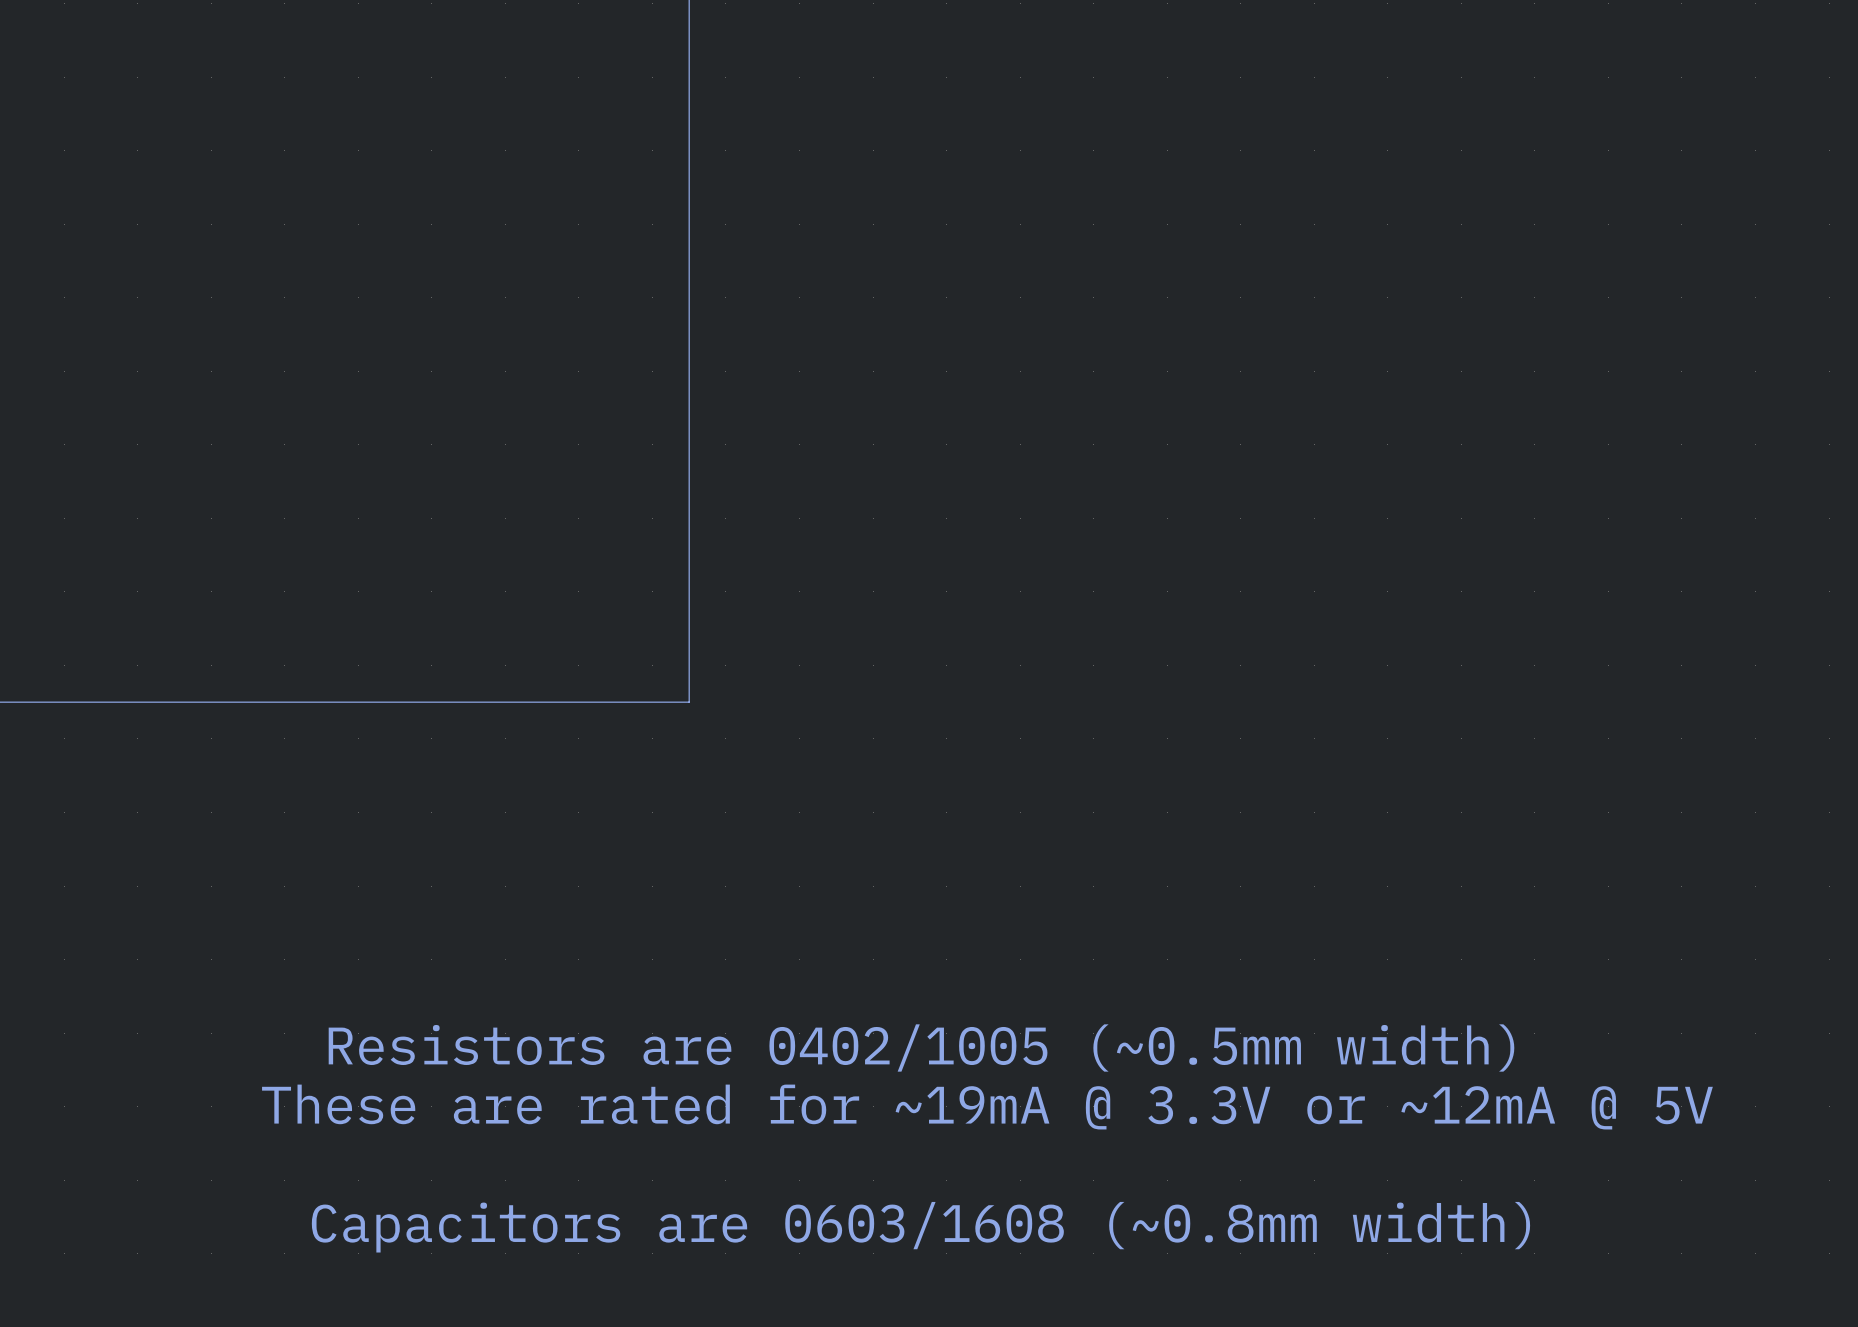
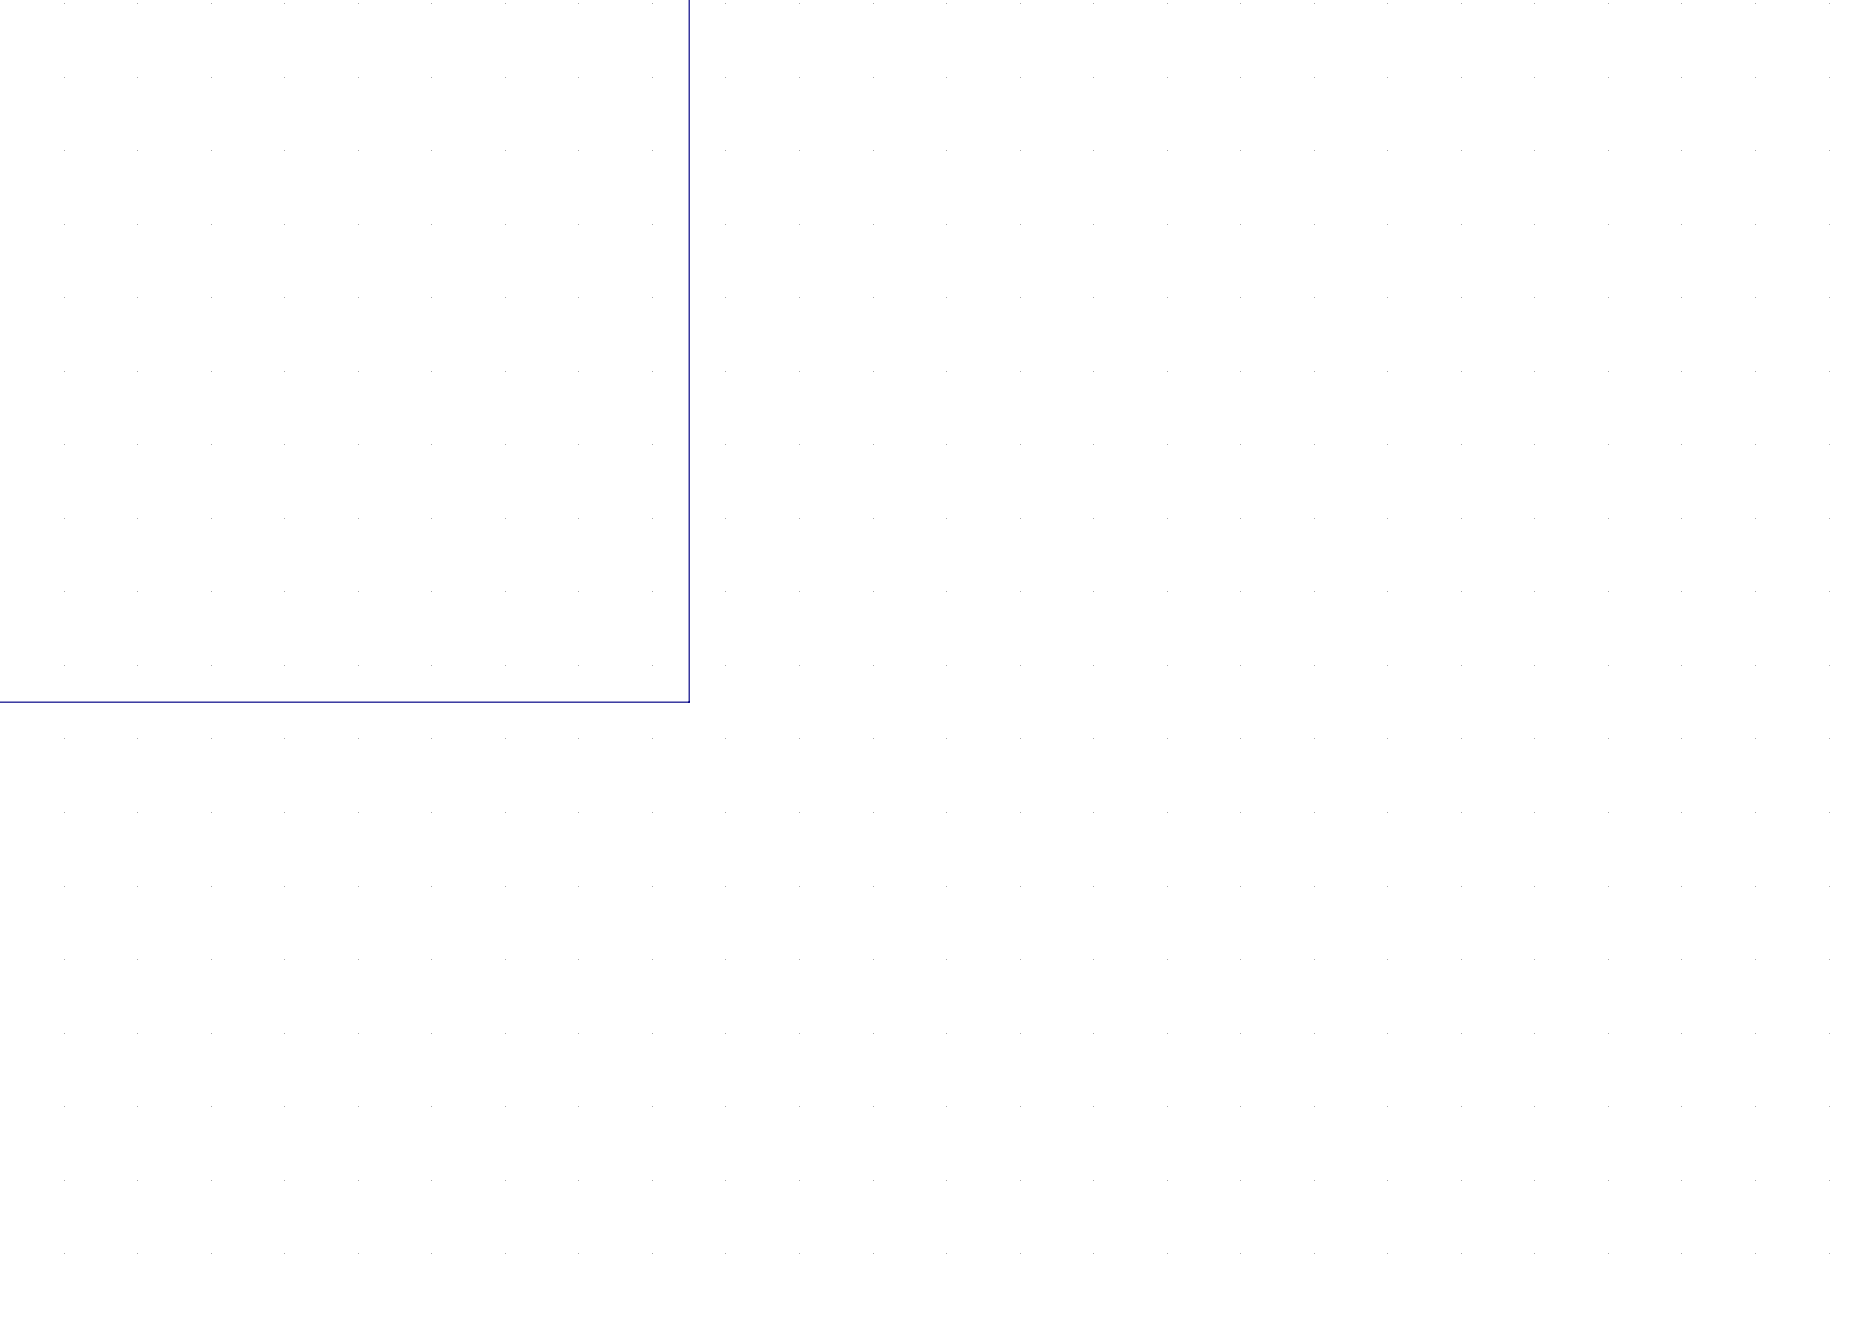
text: Resistors are 0402/1005 (~0.5mm width) (921, 1047) -> none
text: These are rated for ~19mA @ 3.3V or ~12mA @ 5V (987, 1107) -> none
text: Capacitors are 0603/1608 (~0.8mm width) (920, 1227) -> none

